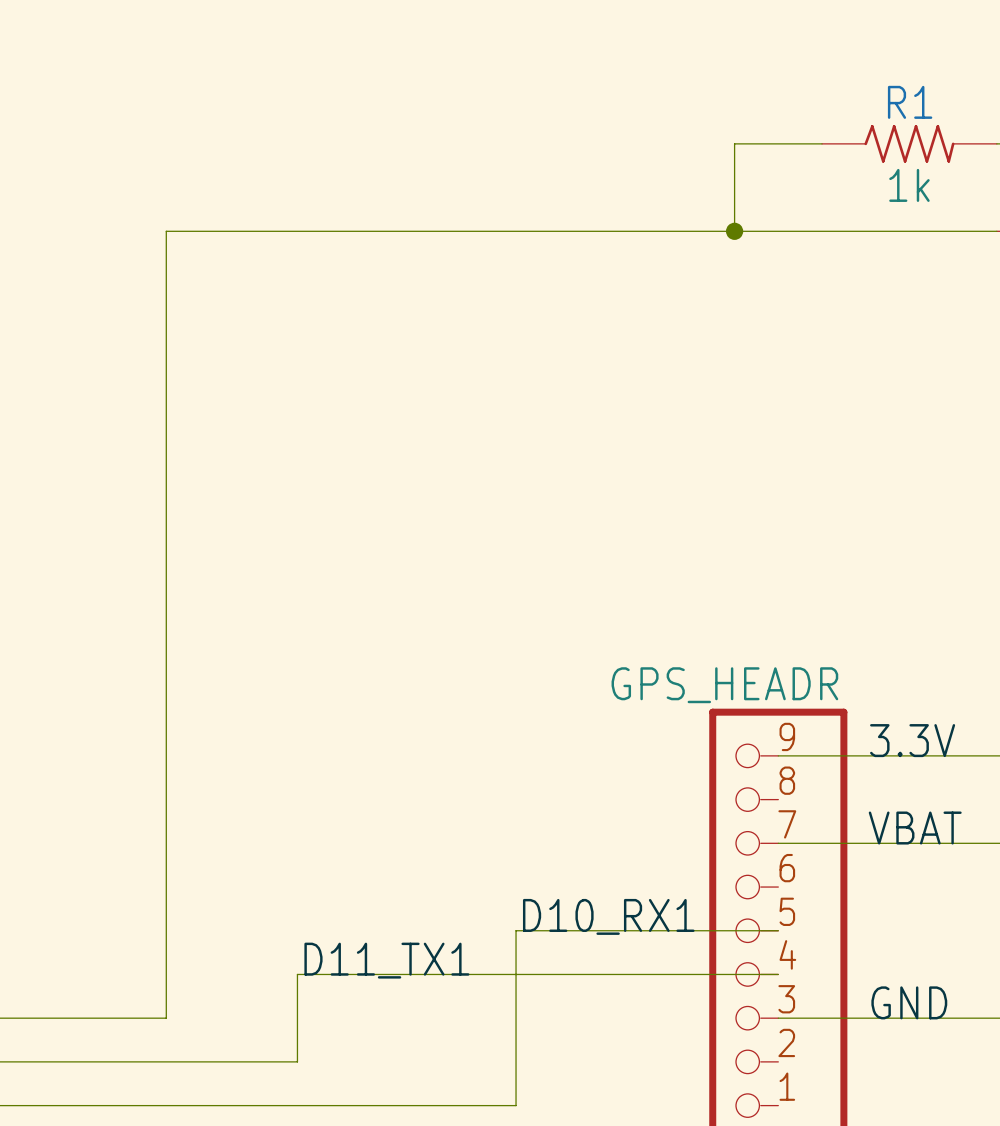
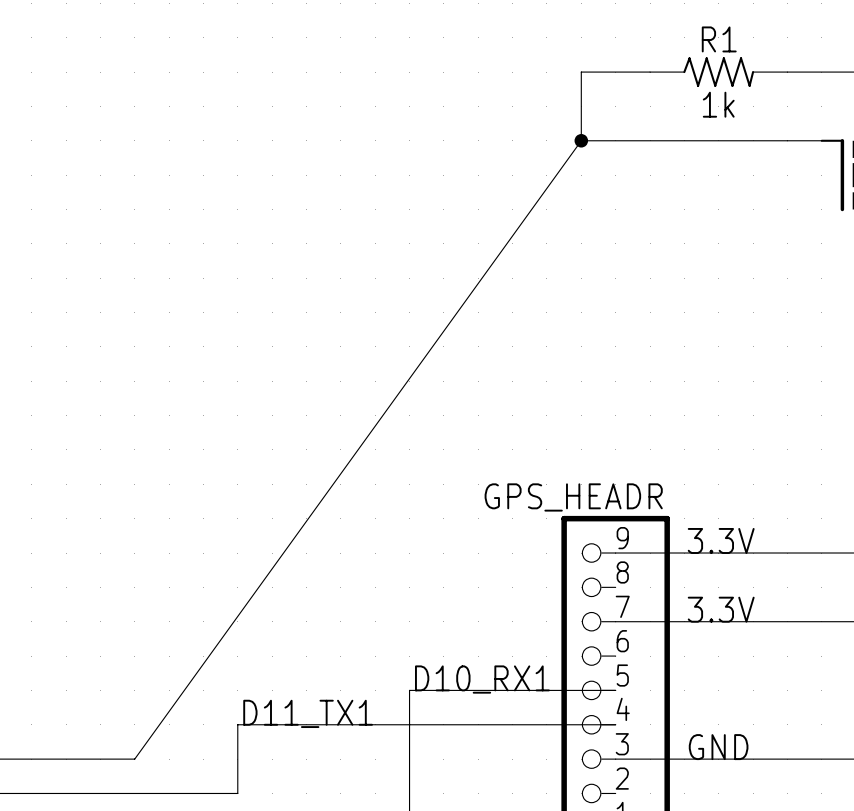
wire: (734, 231) (166, 231) (166, 1018) -> (581, 140) (134, 759)
label: VBAT (915, 828) -> 3.3V (721, 609)

